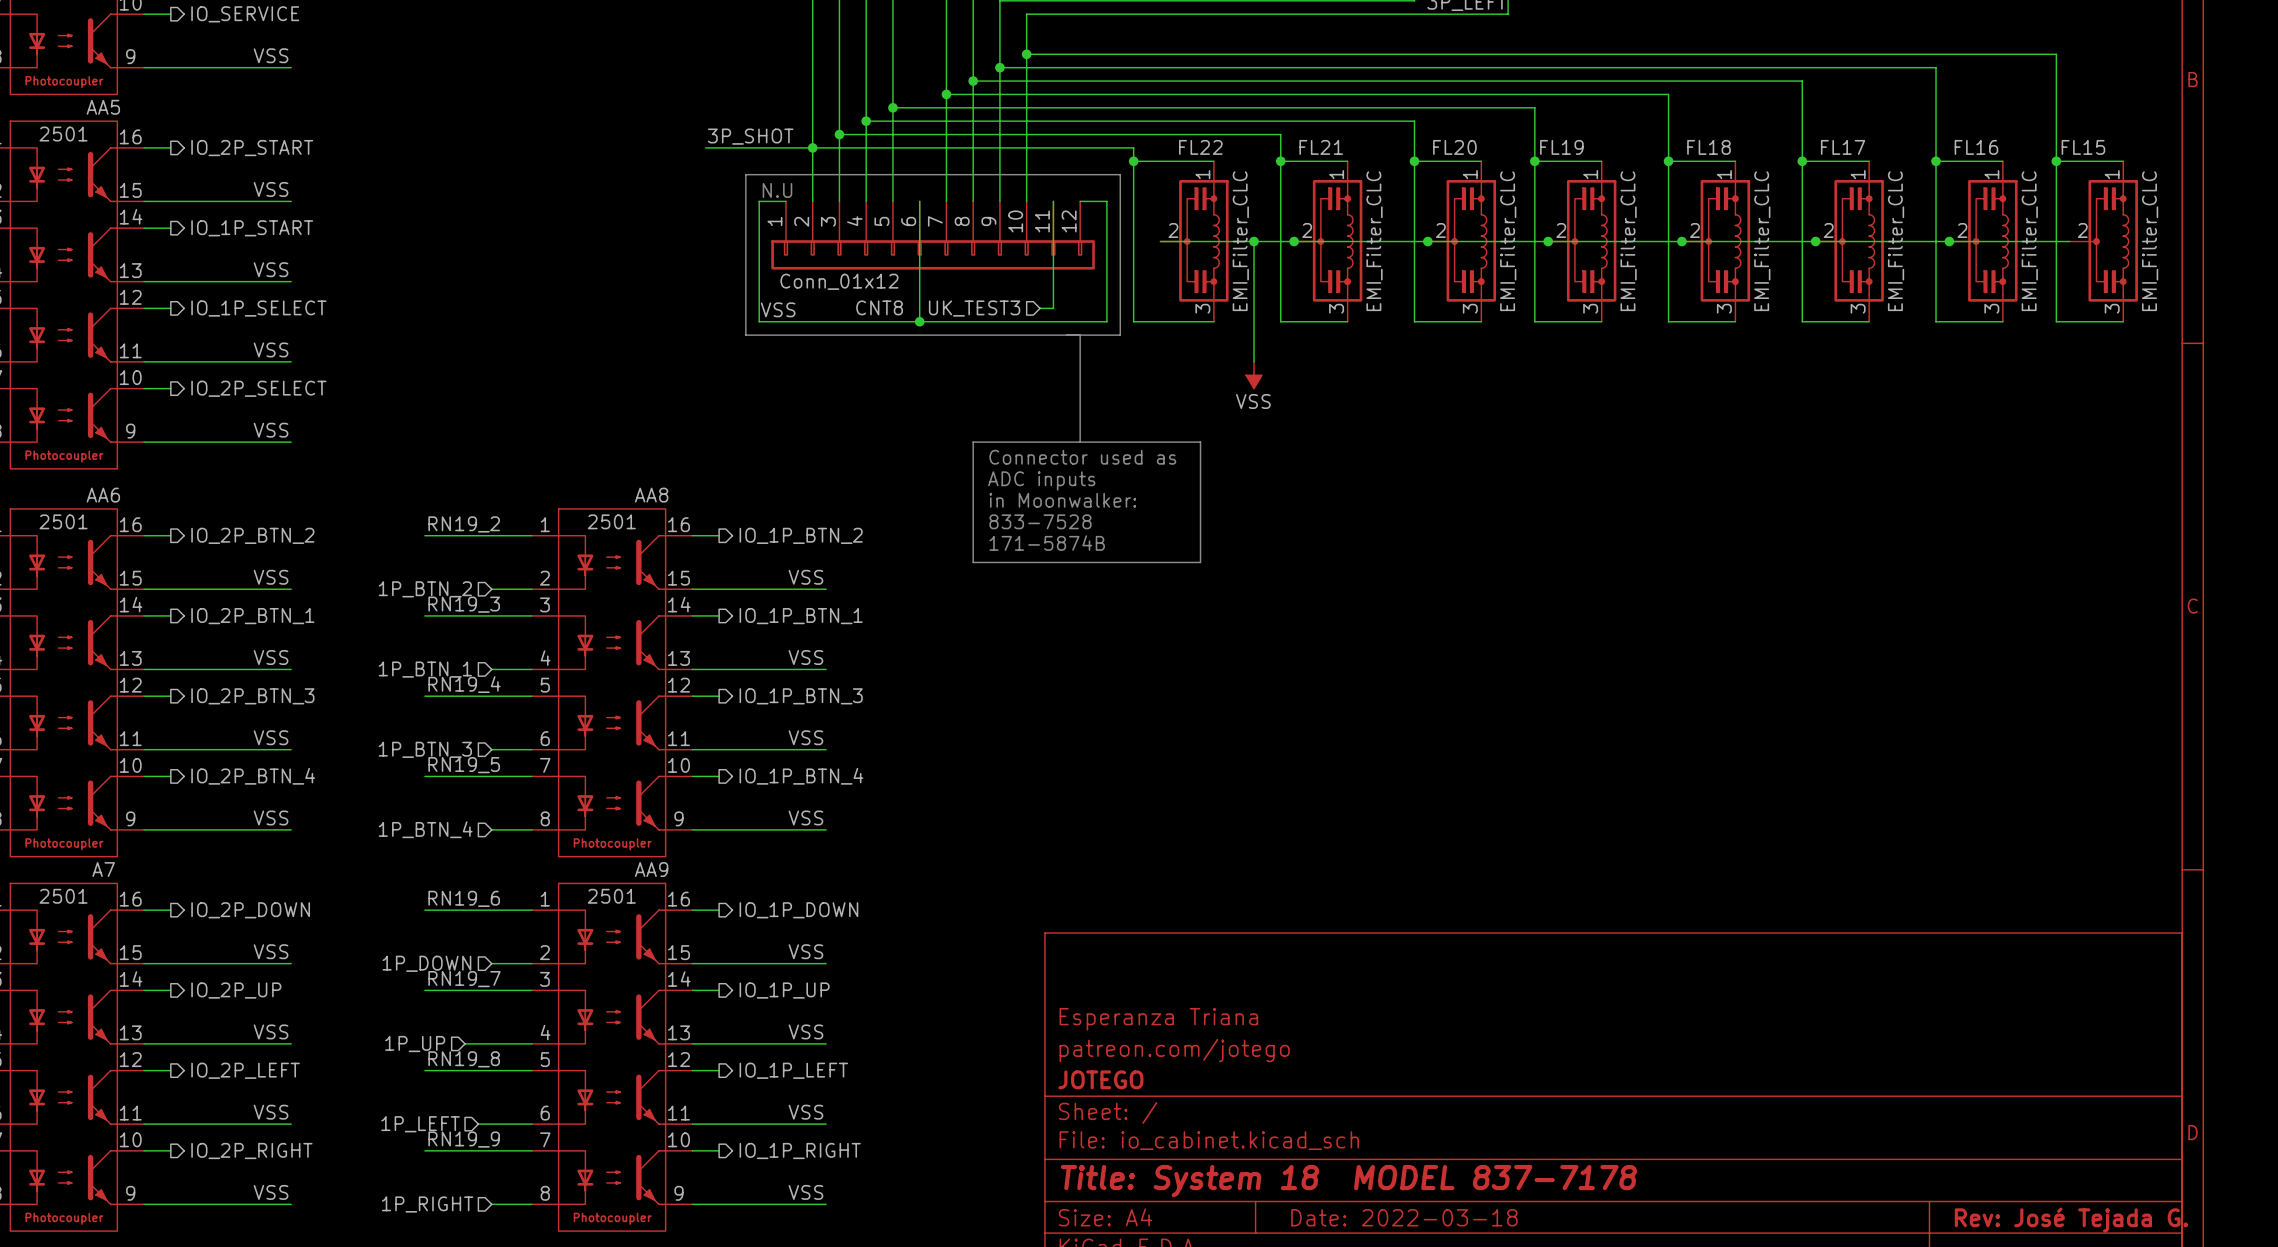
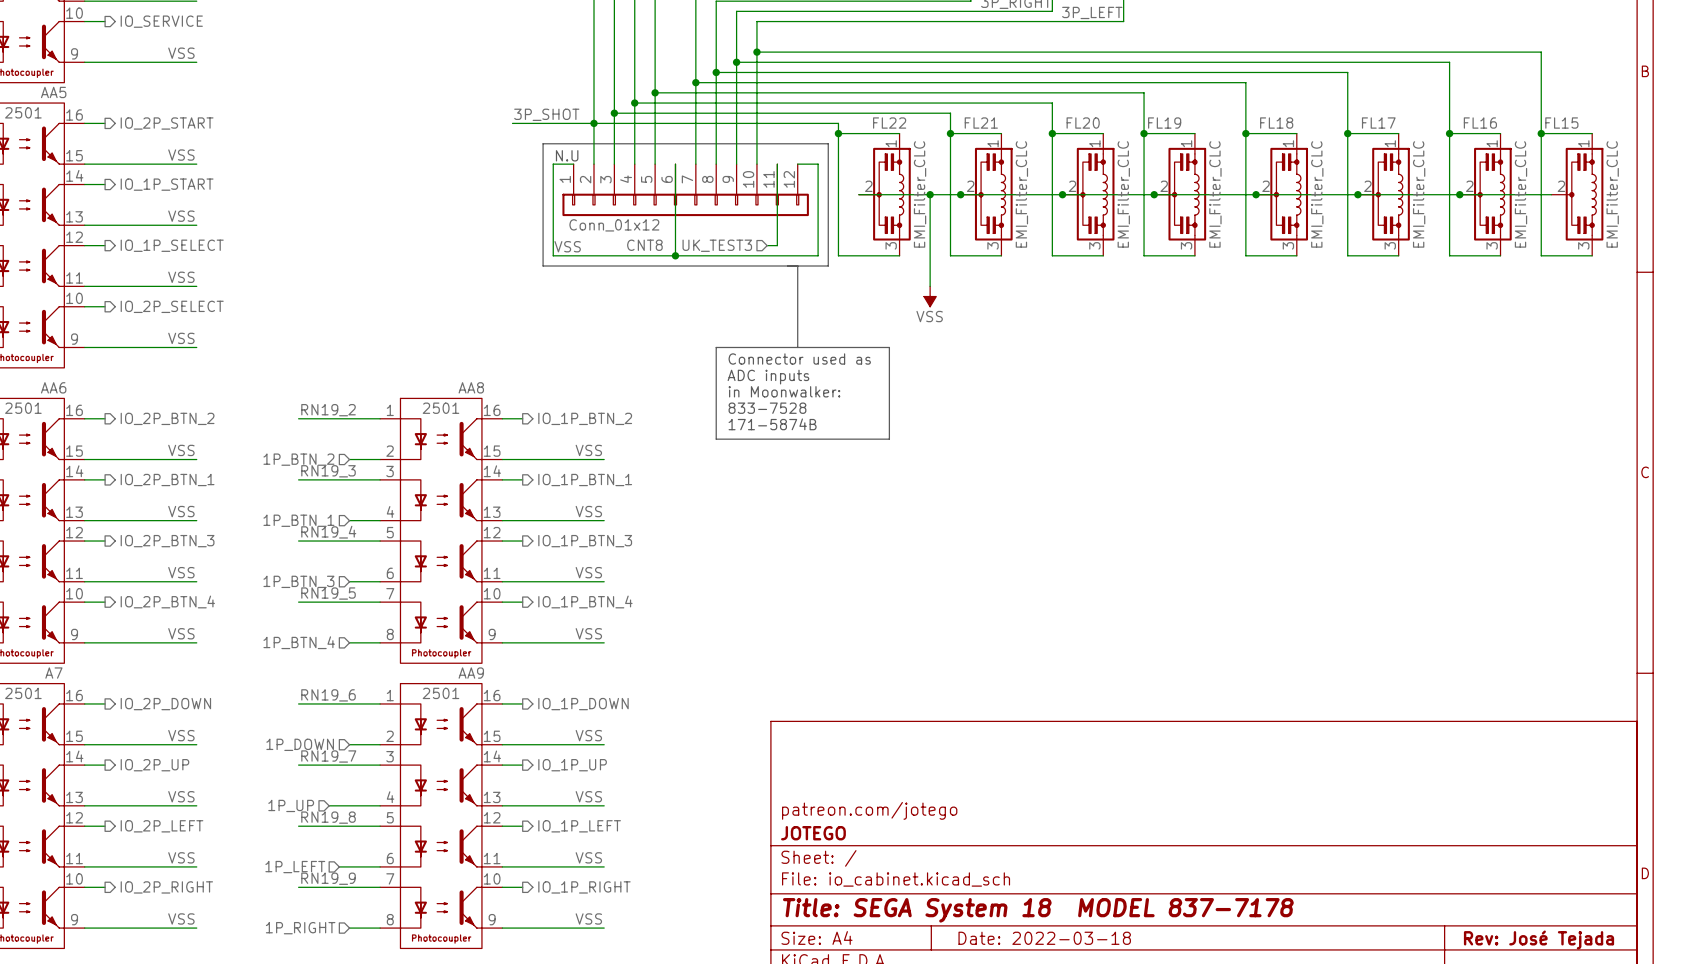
title block: Esperanza Triana (1158, 1019) -> none
title block: Title: System 18 MODEL 837-7178 (1348, 1181) -> Title: SEGA System 18 MODEL 837-7178 (1038, 910)
title block: Rev: José Tejada G. (2071, 1220) -> Rev: José Tejada (1539, 940)

